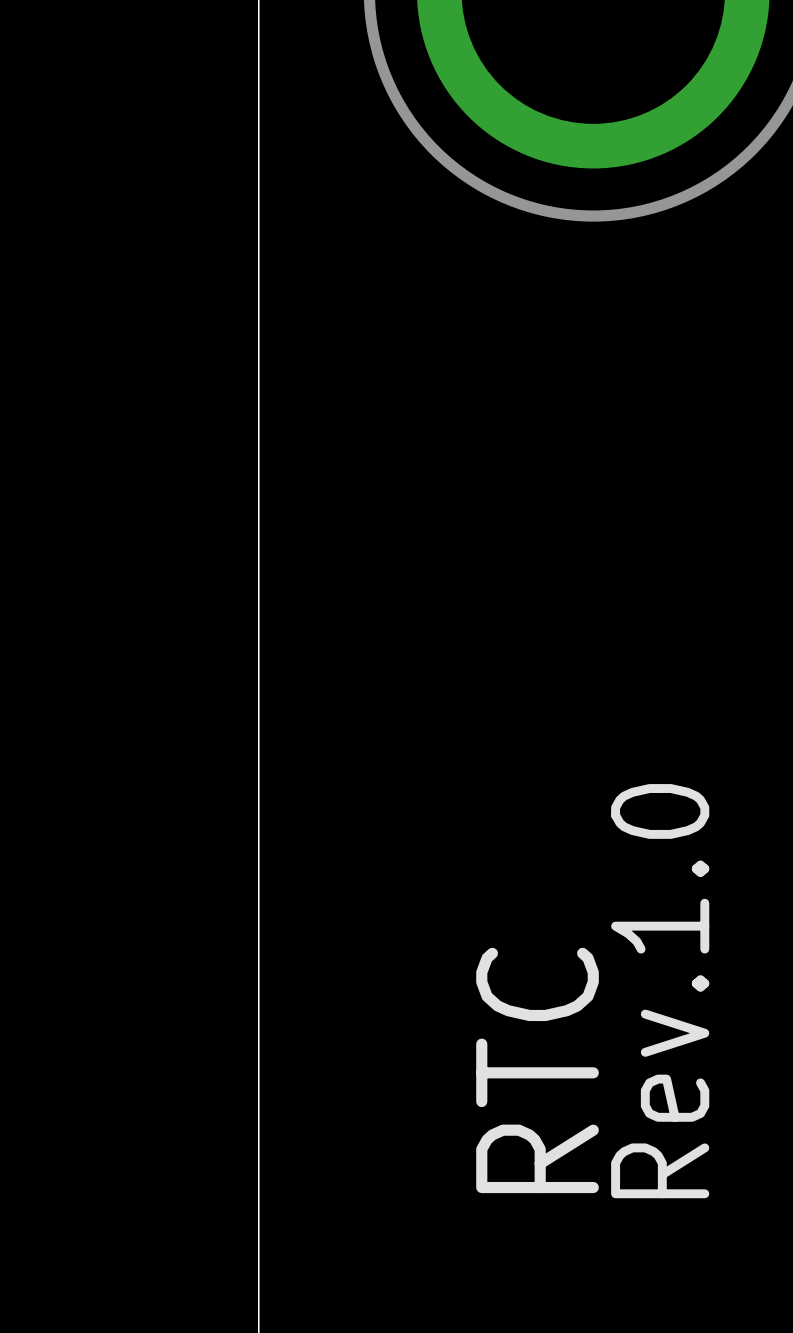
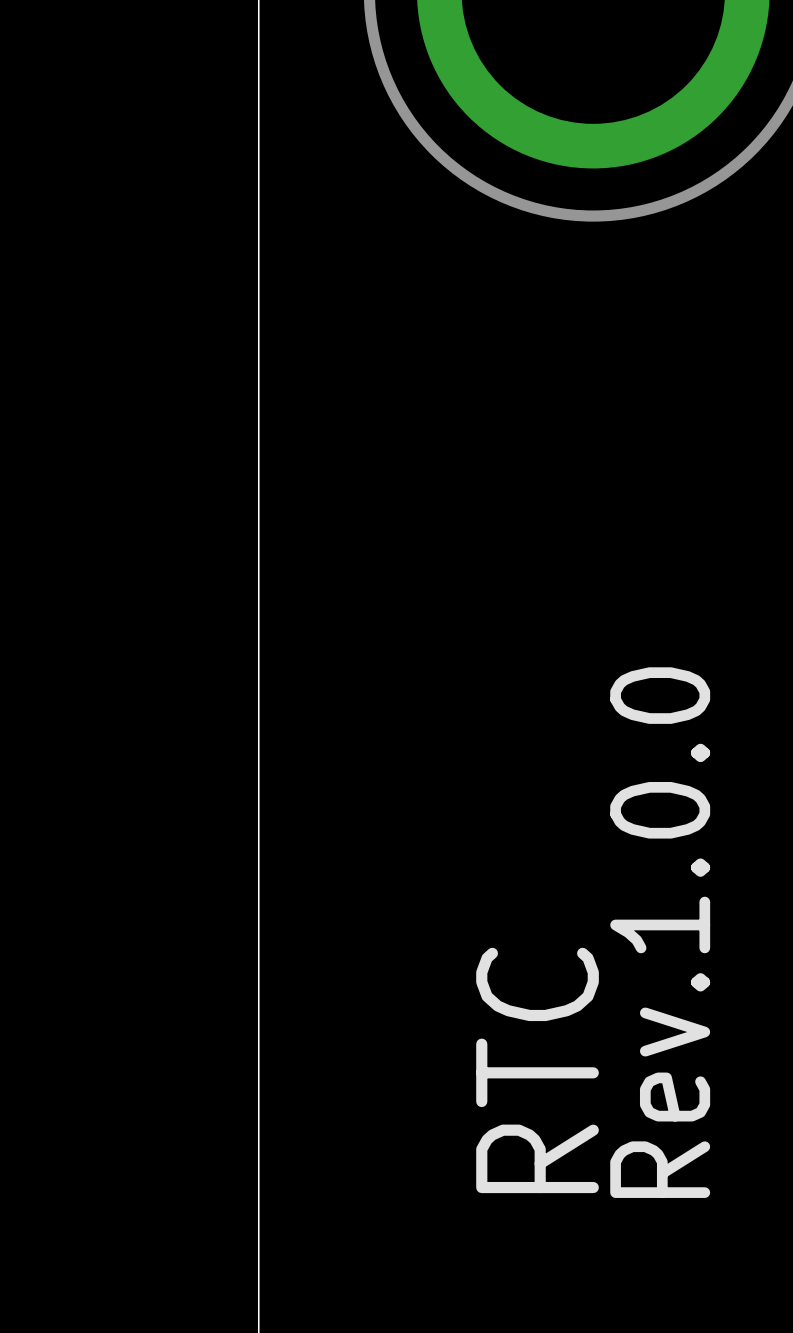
text: Rev.1.0 (660, 991) -> Rev.1.0.0 (660, 932)

